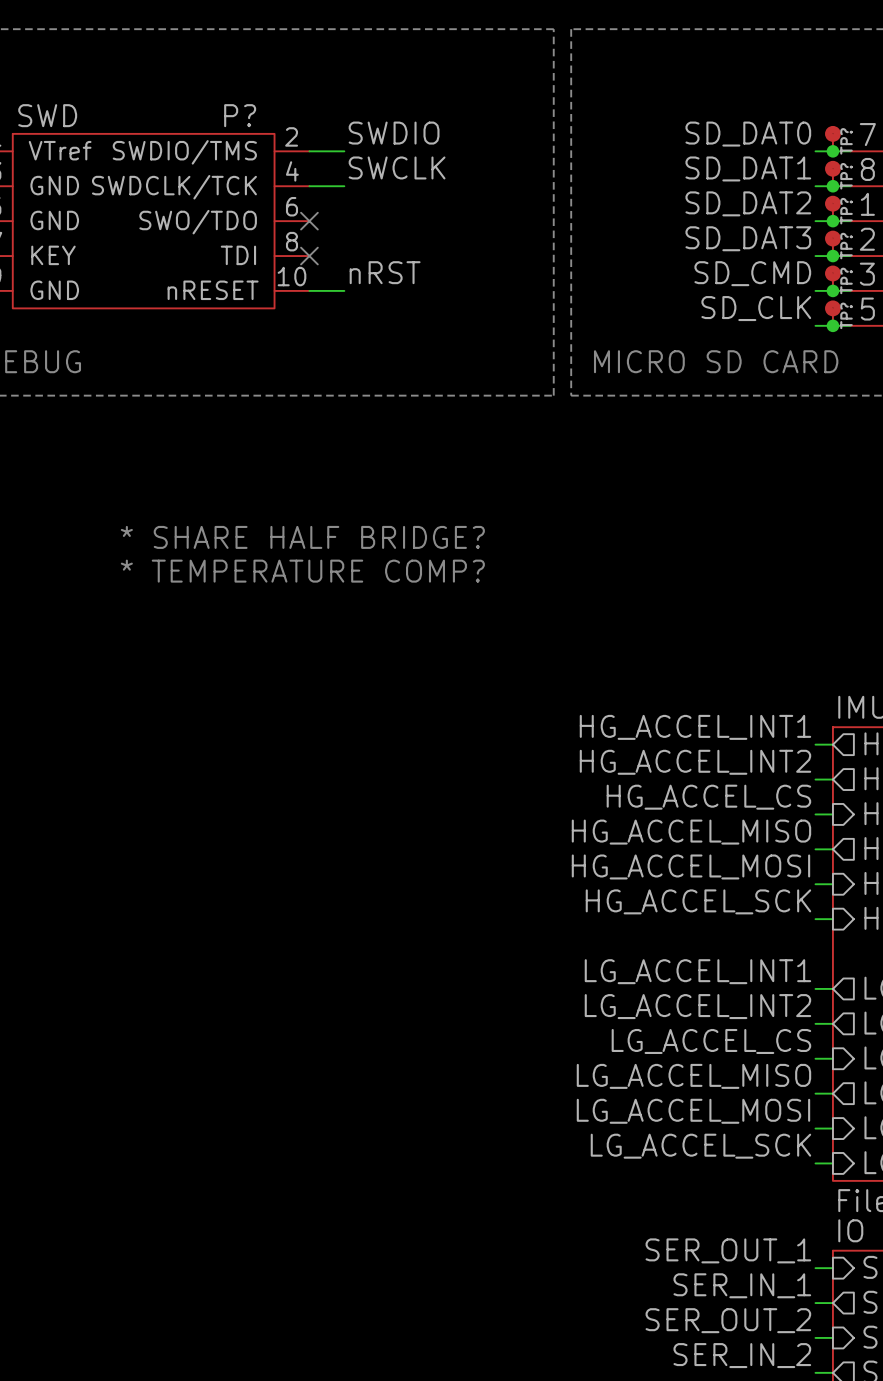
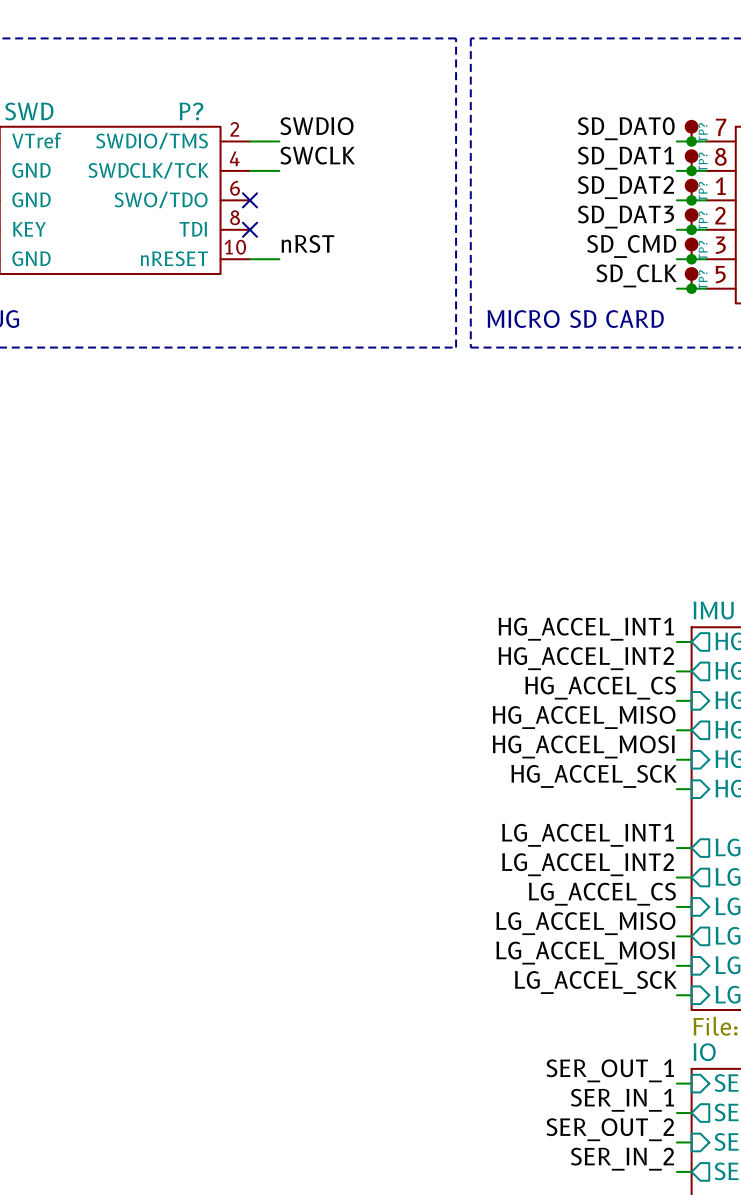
text: * SHARE HALF BRIDGE? (302, 537) -> none
text: * TEMPERATURE COMP? (302, 571) -> none

